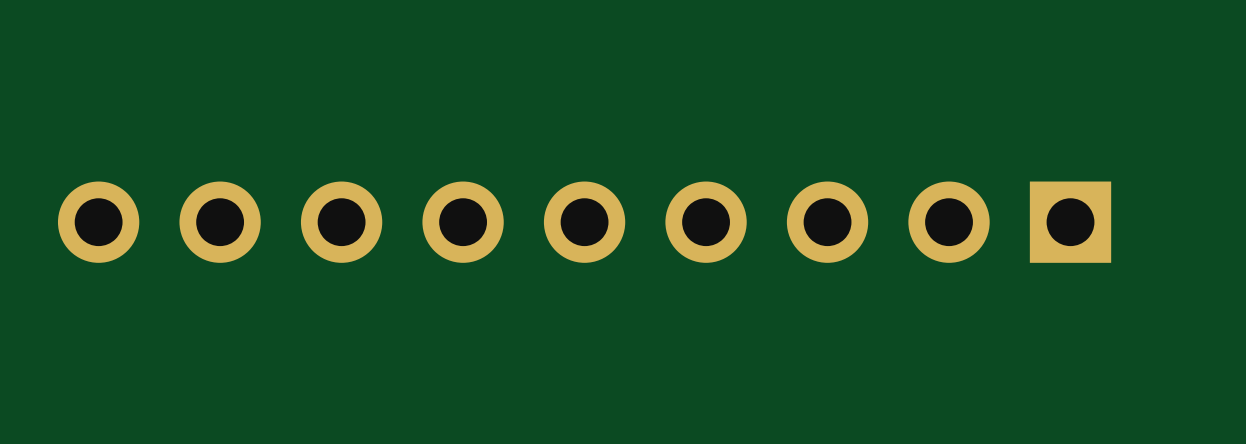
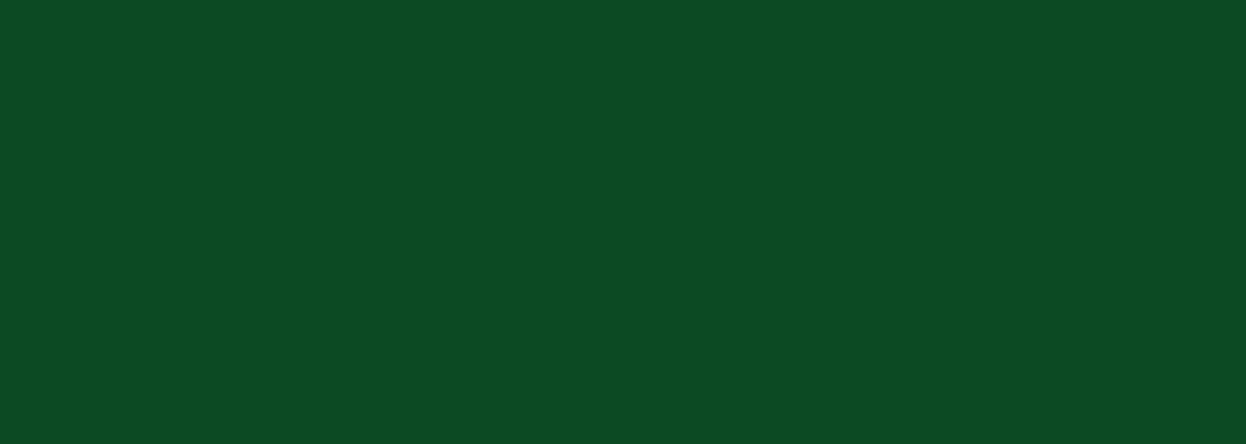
part: (584, 222) -> none

